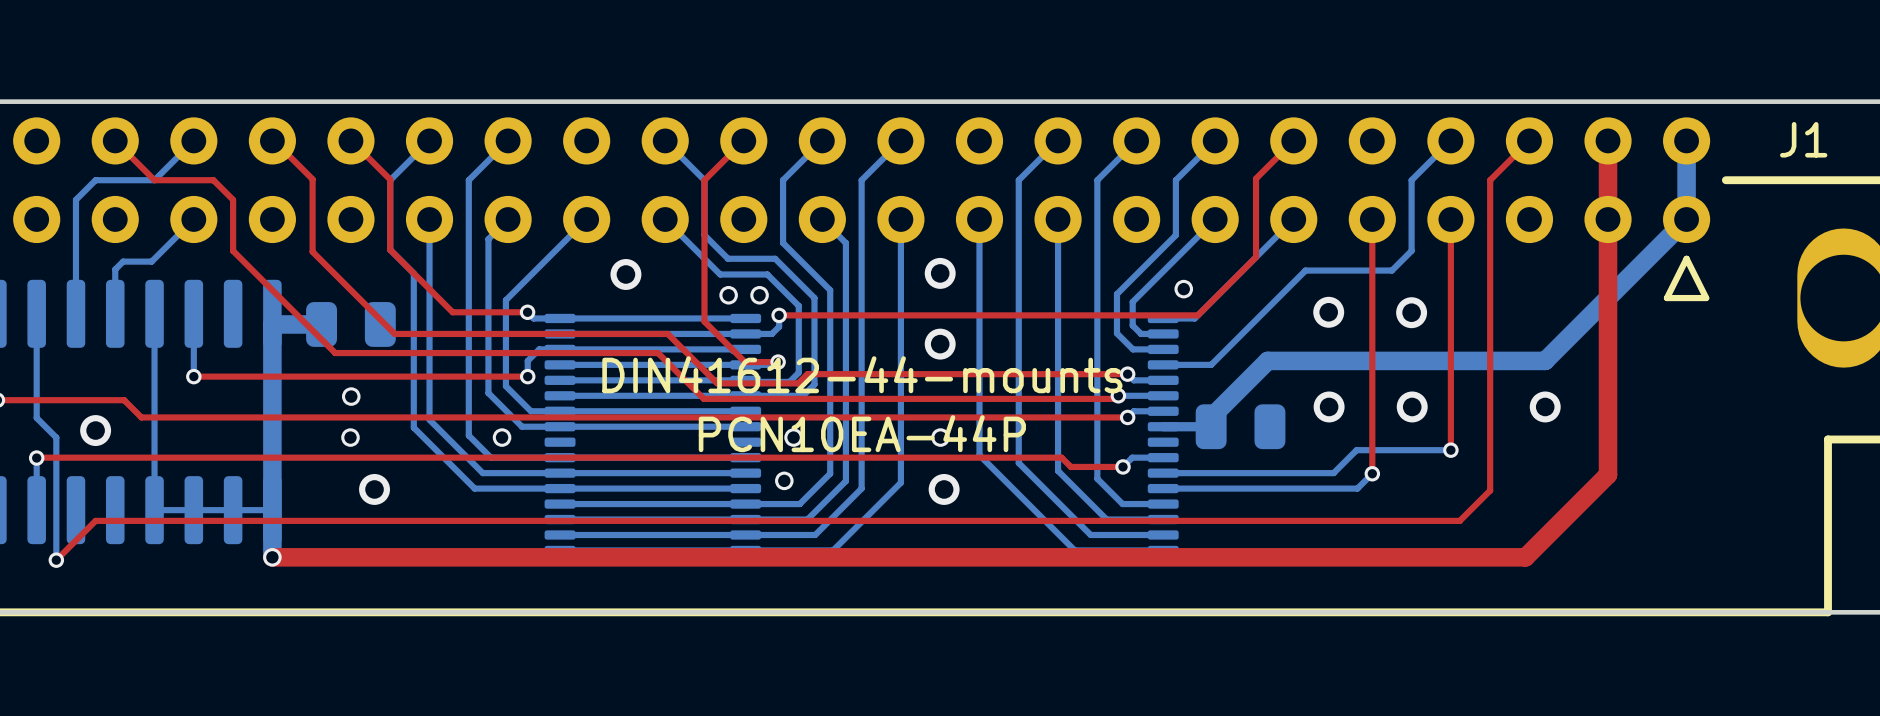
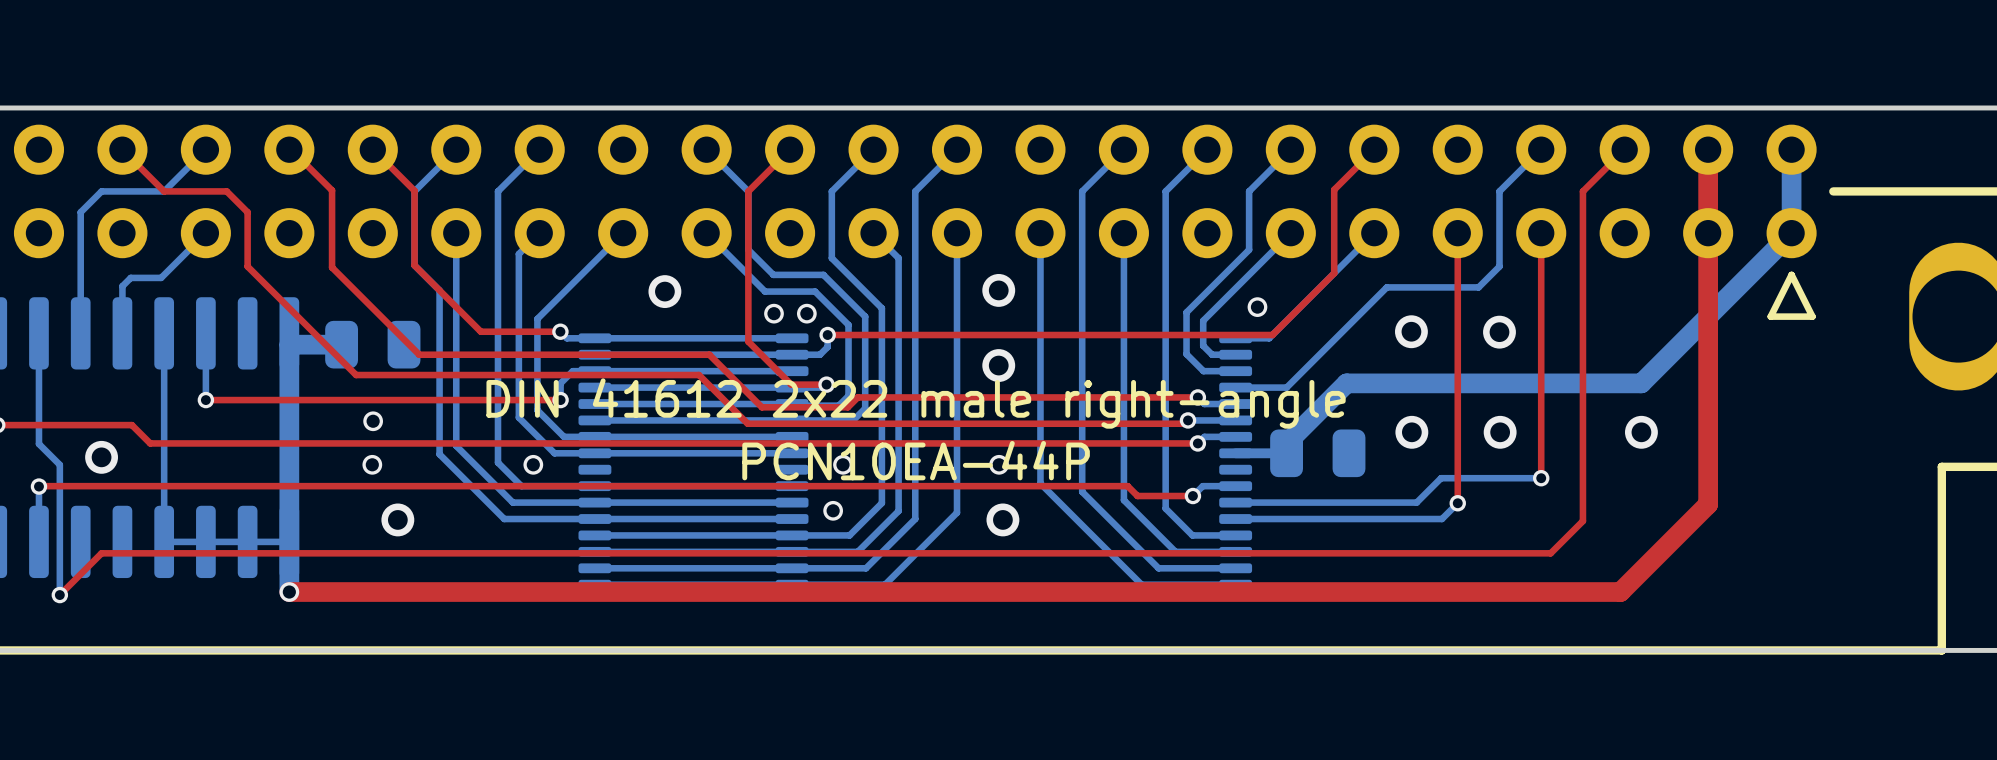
J1 name: J1 (1803, 139) -> none
J1 value: DIN41612-44-mounts (862, 374) -> DIN 41612 2x22 male right-angle (916, 403)

